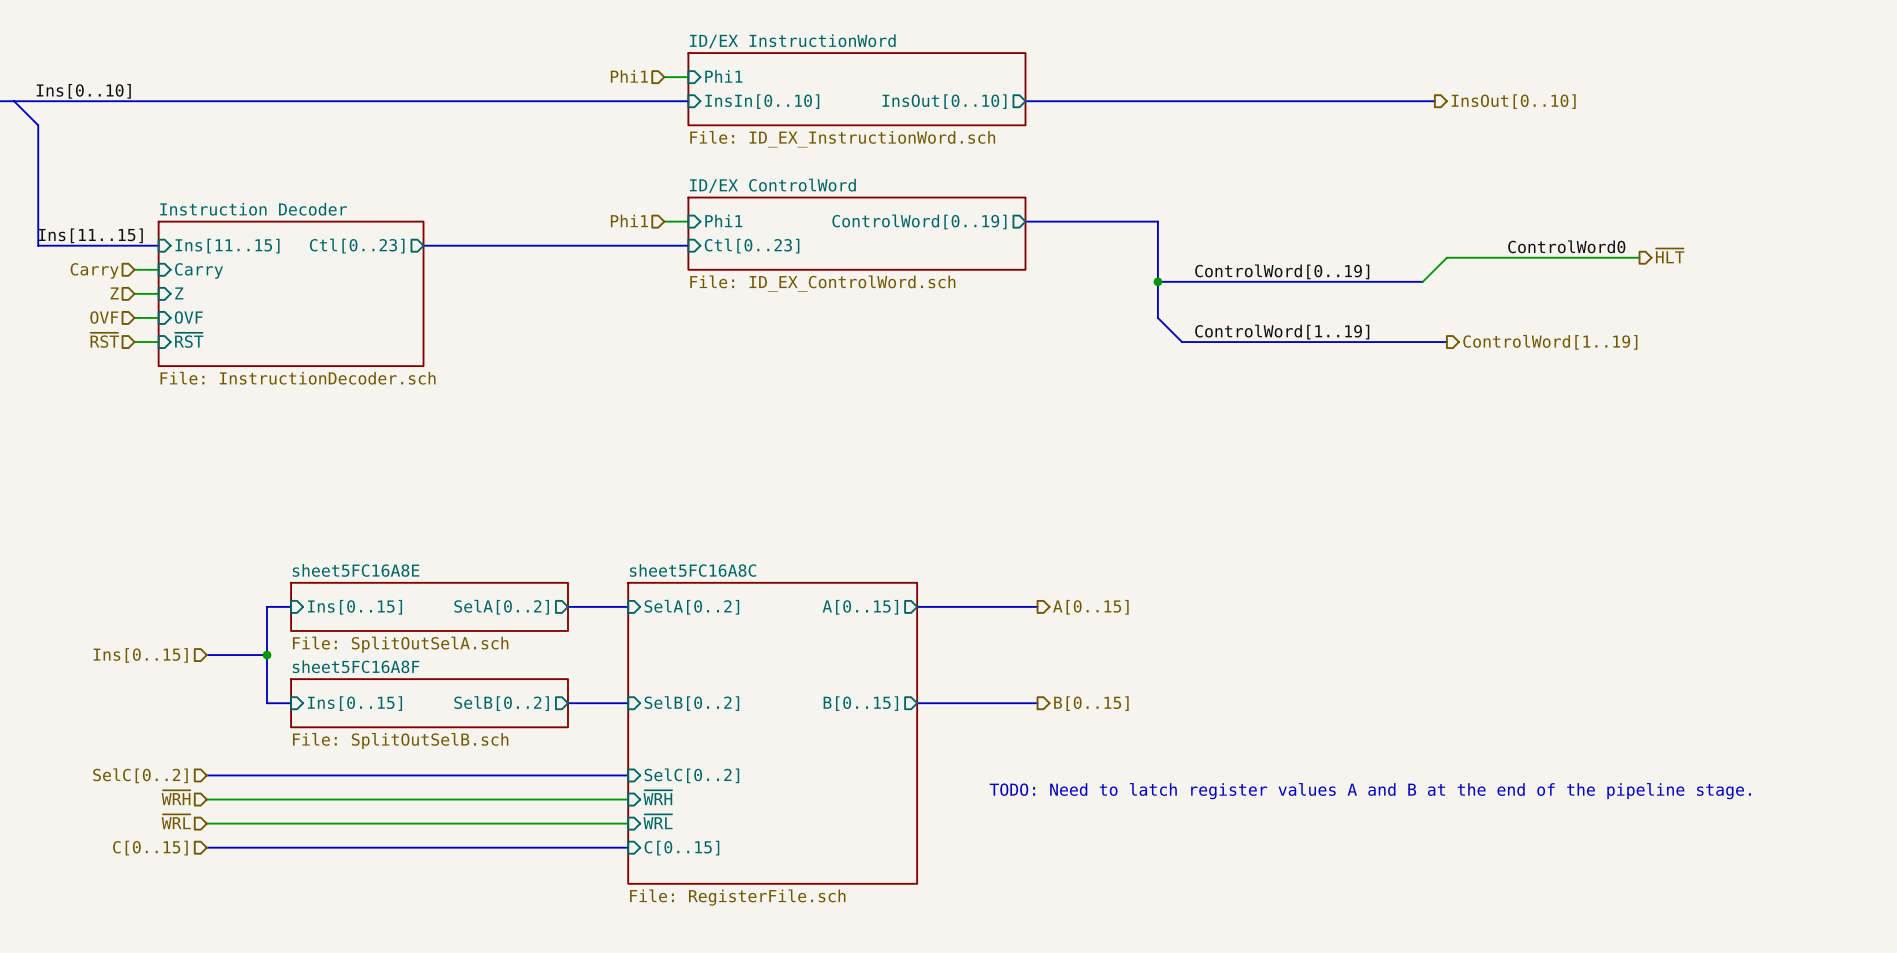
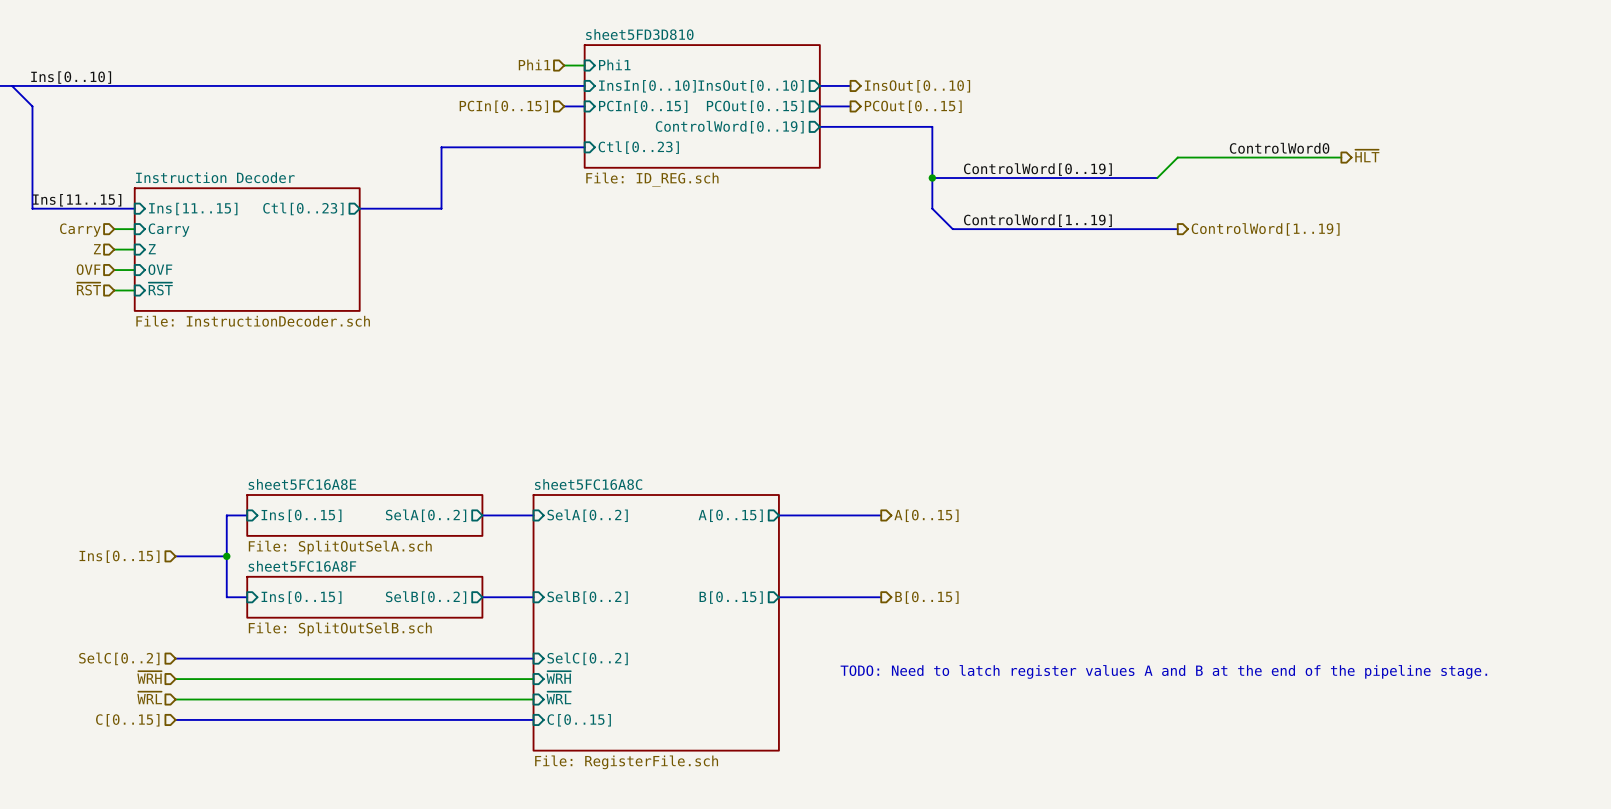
sheet ID/EX InstructionWord: File: ID_EX_InstructionWord.sch (856, 89) -> none
sheet pin position: InsOut[0..10] (944, 101) -> InsOut[0..10] (751, 86)
bus: none -> (819, 85) (850, 85)
bus: (1025, 101) (1434, 101) -> none
hierarchical label: none -> InsOut[0..10] (917, 86)
hierarchical label: InsOut[0..10] (1513, 101) -> none
hierarchical label: none -> PCIn[0..15] (503, 106)
bus: none -> (564, 106) (584, 106)
sheet pin: none -> PCIn[0..15] (643, 106)
sheet sheet5FD3D810: none -> File: ID_REG.sch (702, 106)
sheet pin: none -> PCOut[0..15] (755, 106)
bus: none -> (819, 106) (850, 106)
hierarchical label: none -> PCOut[0..15] (913, 106)
junction: none -> (932, 178)
hierarchical label: Phi1 (629, 220) -> none
sheet pin: Phi1 (723, 220) -> none
wire: (664, 221) (688, 221) -> none
sheet pin position: ControlWord[0..19] (919, 221) -> ControlWord[0..19] (729, 127)
bus: (1025, 221) (1157, 221) (1157, 317) (1182, 342) (1446, 342) -> (819, 126) (932, 126) (932, 208) (952, 229) (1177, 229)
sheet ID/EX ControlWord: File: ID_EX_ControlWord.sch (856, 233) -> none
bus: (519, 245) (688, 245) -> (441, 208) (441, 147) (584, 147)
sheet pin position: Ctl[0..23] (752, 246) -> Ctl[0..23] (638, 147)
label position: ControlWord0 (1566, 246) -> ControlWord0 (1279, 148)
hierarchical label position: ~{HLT} (1670, 255) -> ~{HLT} (1367, 155)
wire: (1639, 257) (1446, 257) (1422, 281) -> (1341, 157) (1177, 157) (1157, 178)
label position: ControlWord[0..19] (1282, 271) -> ControlWord[0..19] (1037, 169)
bus: (1157, 281) (1422, 281) -> (932, 178) (1157, 178)
junction: (1157, 281) -> none
label position: ControlWord[1..19] (1282, 332) -> ControlWord[1..19] (1037, 220)
hierarchical label position: ControlWord[1..19] (1550, 342) -> ControlWord[1..19] (1265, 229)

